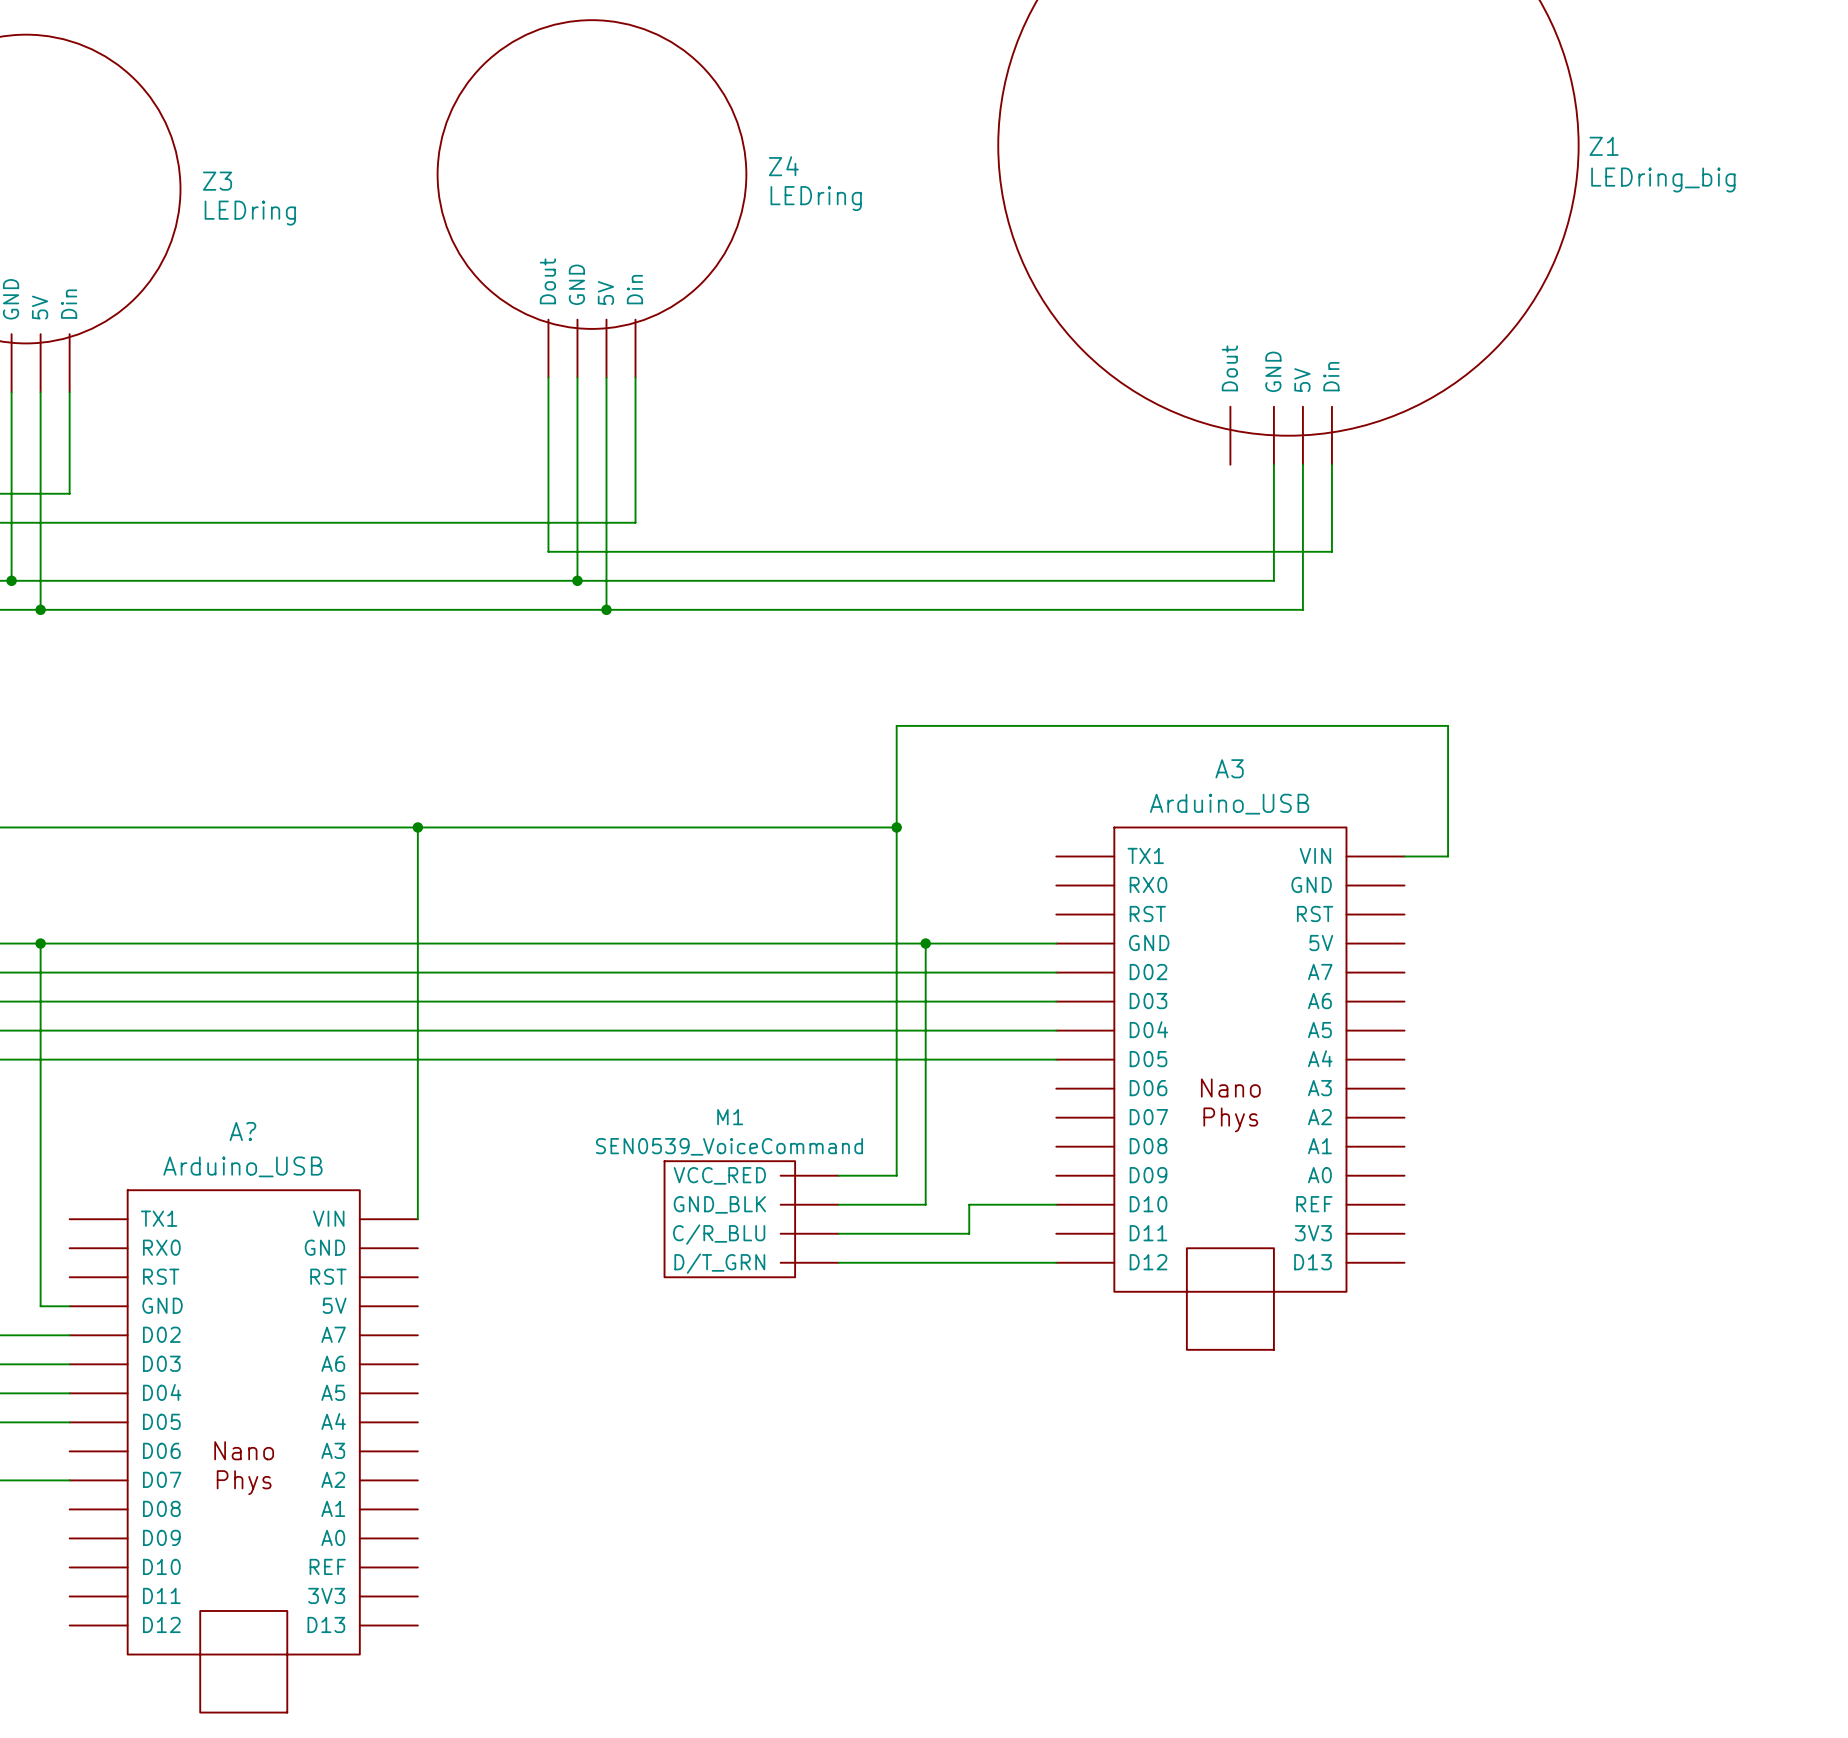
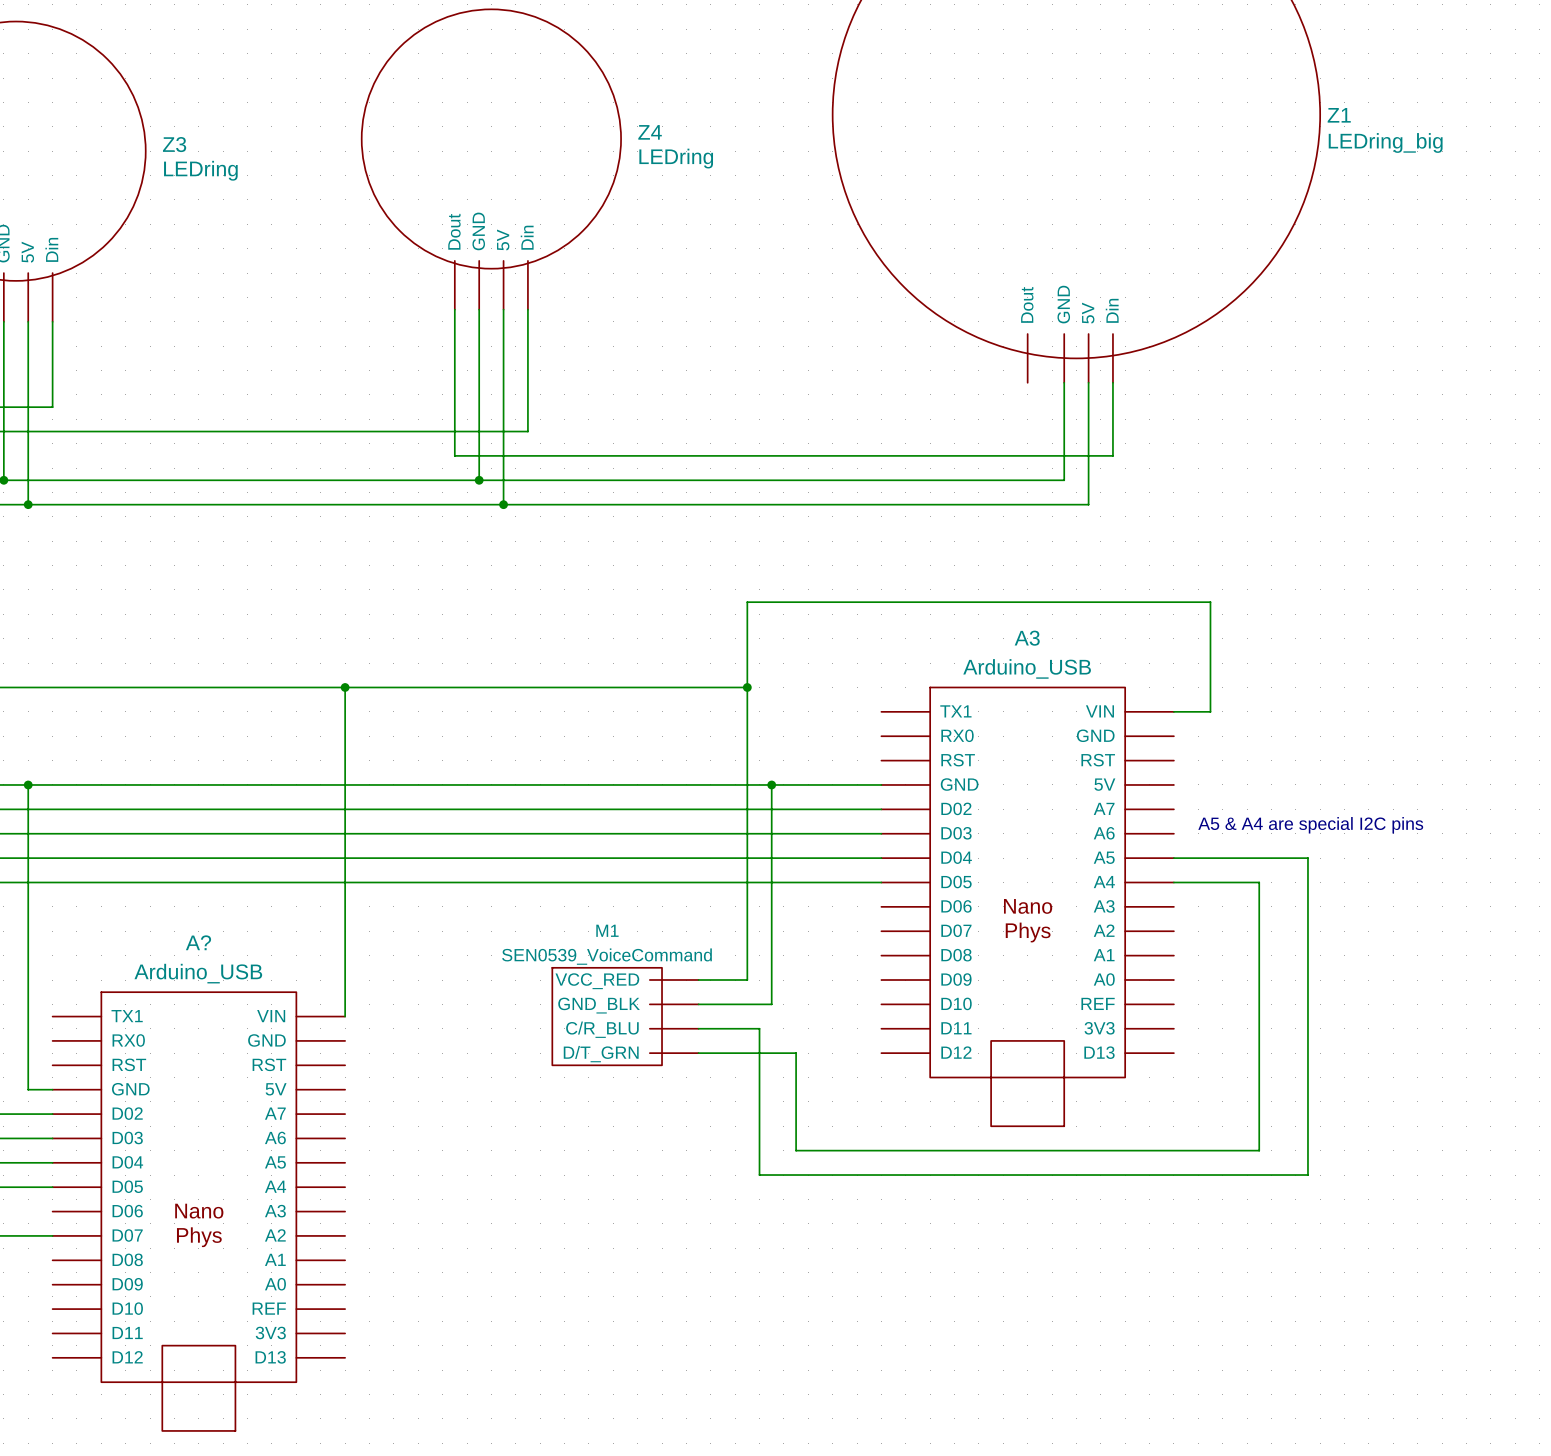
text: none -> A5 & A4 are special I2C pins (1310, 825)
wire: (1056, 1204) (969, 1204) (969, 1233) (911, 1233) -> (1173, 858) (1307, 858) (1307, 1175) (759, 1175) (759, 1028)
wire: (954, 1262) (1056, 1262) -> (796, 1053) (796, 1150) (1259, 1150) (1259, 882) (1173, 882)

